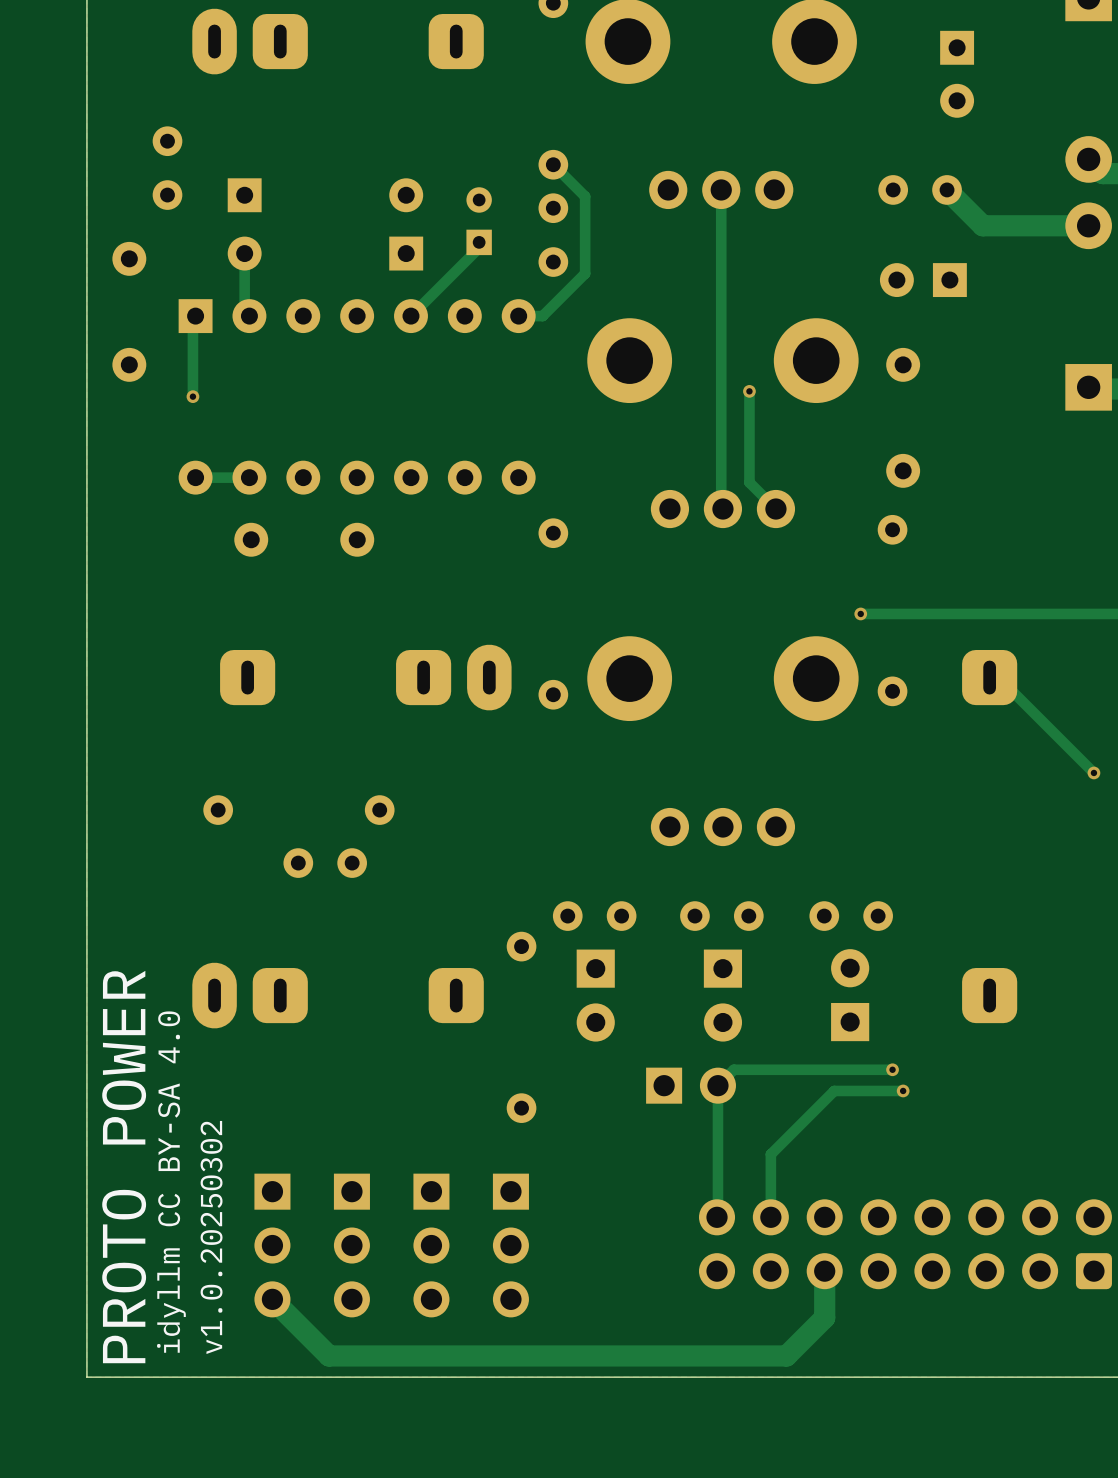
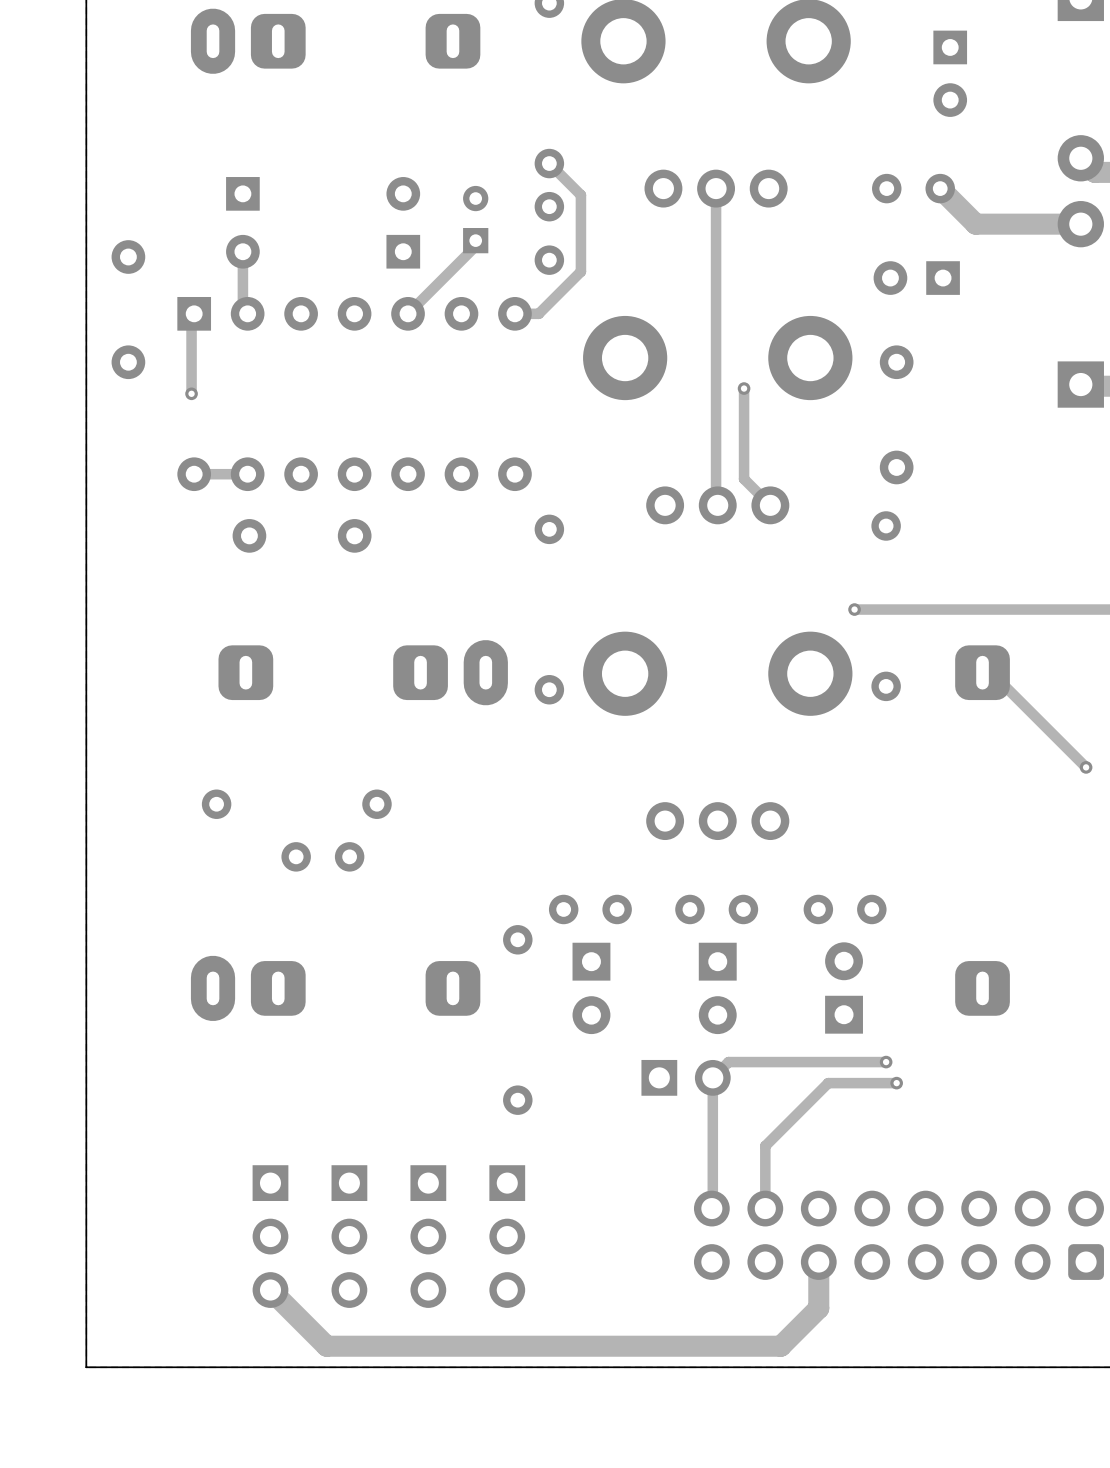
part: (167, 168) -> none
text: PROTO POWER (124, 1167) -> none
text: idyllm CC BY-SA 4.0 (171, 1182) -> none
text: v1.0.20250302 (211, 1237) -> none

